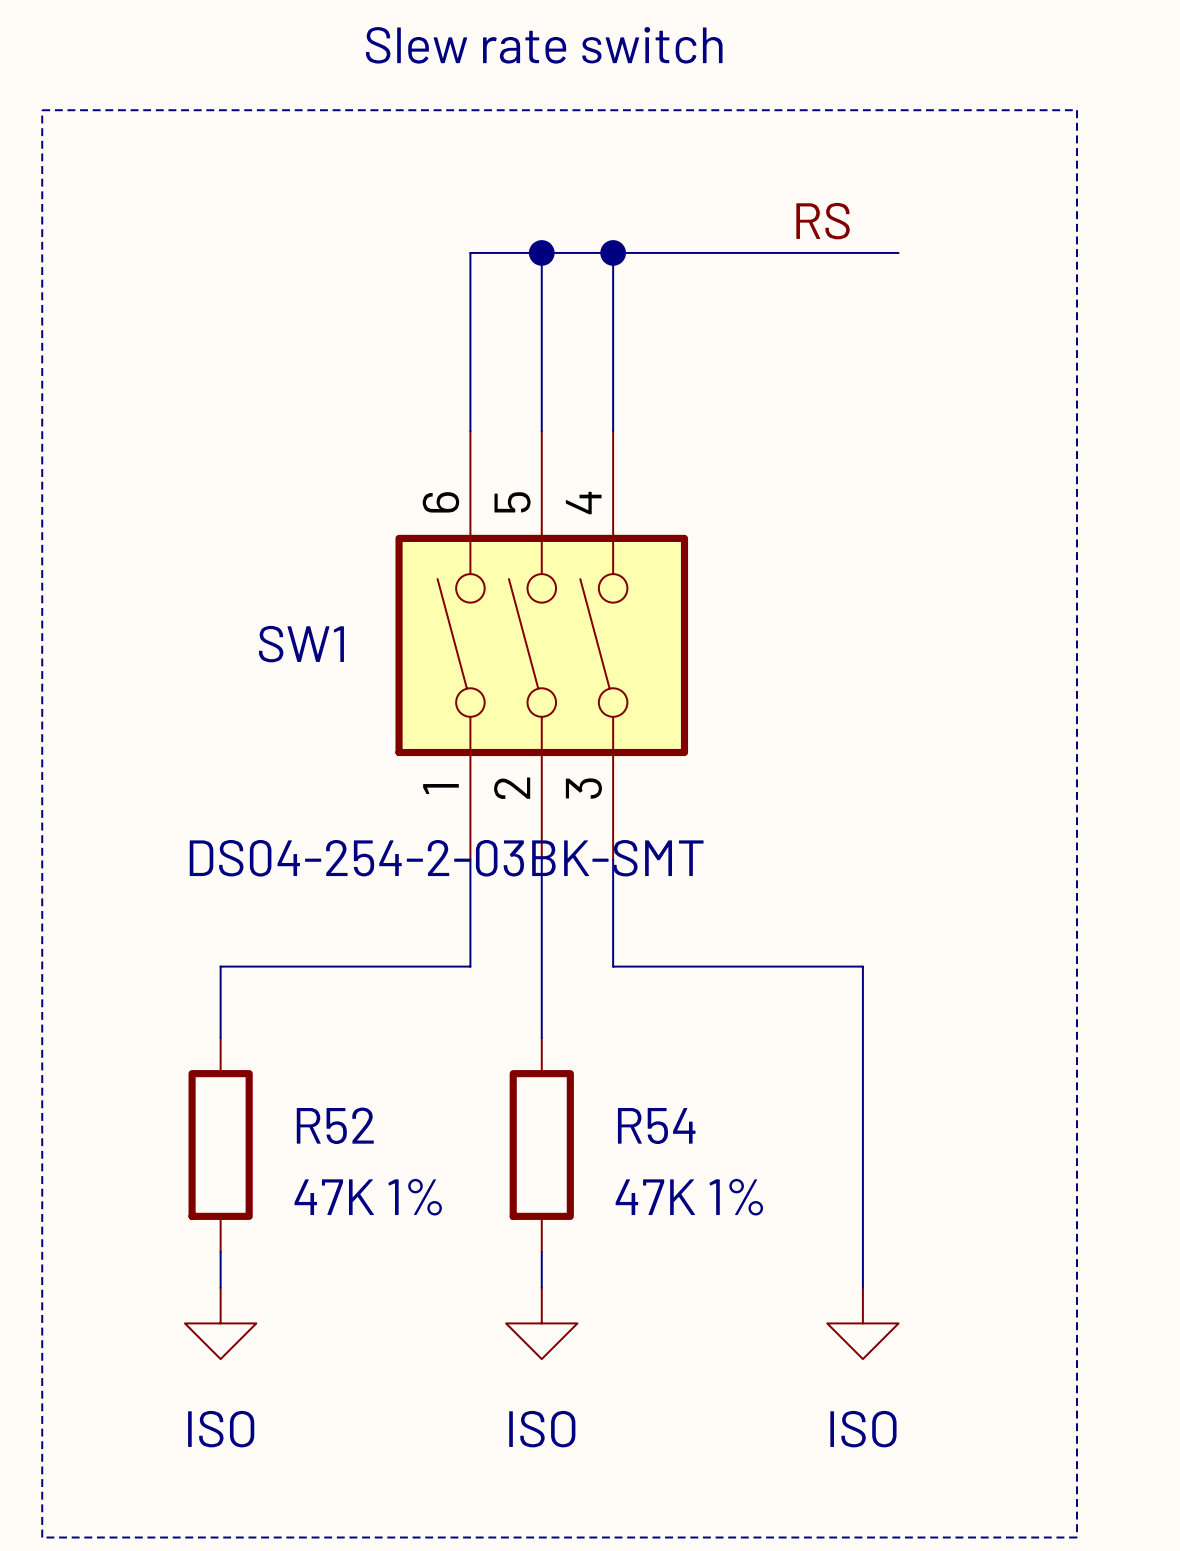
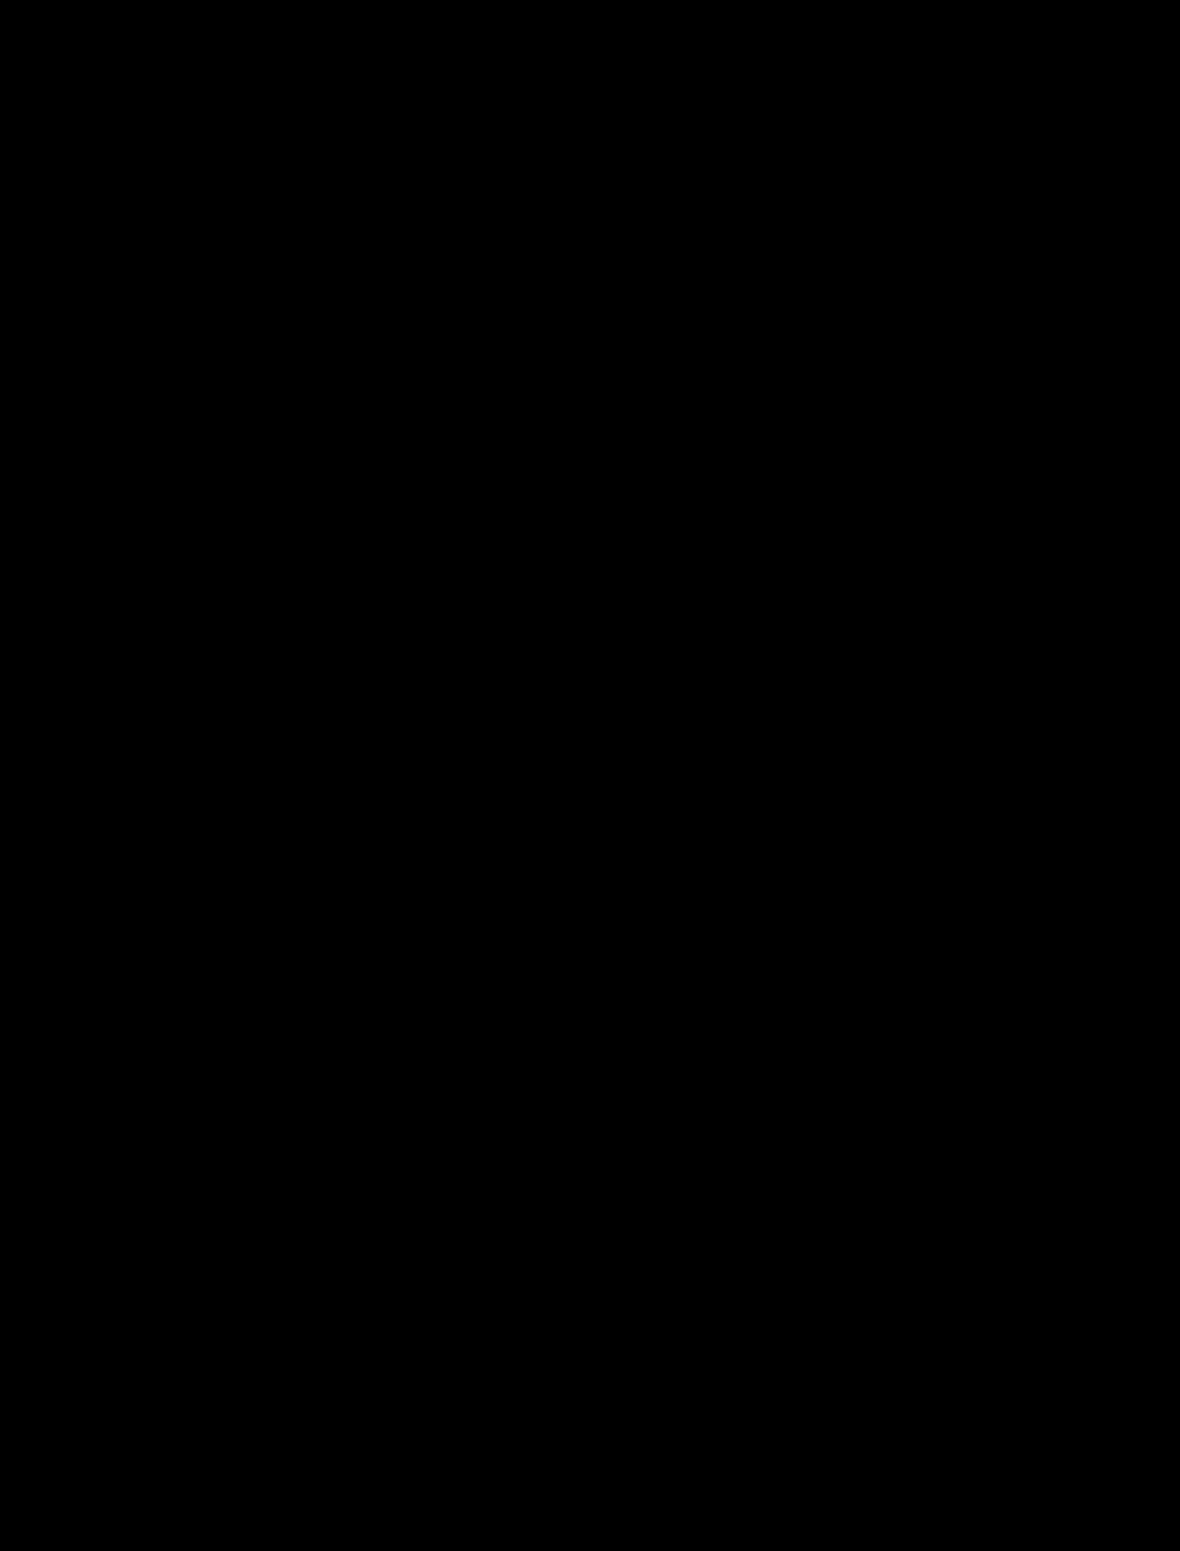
text: Slew rate switch (544, 45) -> none
line: (42, 110) (1077, 110) (1077, 1537) (42, 1537) (42, 110) -> none
label: RS (823, 221) -> none
wire: (541, 252) (541, 431) -> none
junction: (541, 252) -> none
wire: (613, 252) (613, 431) -> none
junction: (613, 252) -> none
wire: (898, 252) (470, 252) (470, 431) -> none
SW1: DS04-254-2-03BK-SMT (541, 645) -> none
wire: (470, 859) (470, 966) (220, 966) (220, 1037) -> none
wire: (541, 859) (541, 1037) -> none
wire: (613, 859) (613, 966) (862, 966) (862, 1287) -> none
R52: 47K 1% (220, 1145) -> none
R54: 47K 1% (541, 1145) -> none
wire: (220, 1252) (220, 1287) -> none
wire: (541, 1252) (541, 1287) -> none
power symbol: ISO (220, 1323) -> none
power symbol: ISO (541, 1323) -> none
power symbol: ISO (862, 1323) -> none

